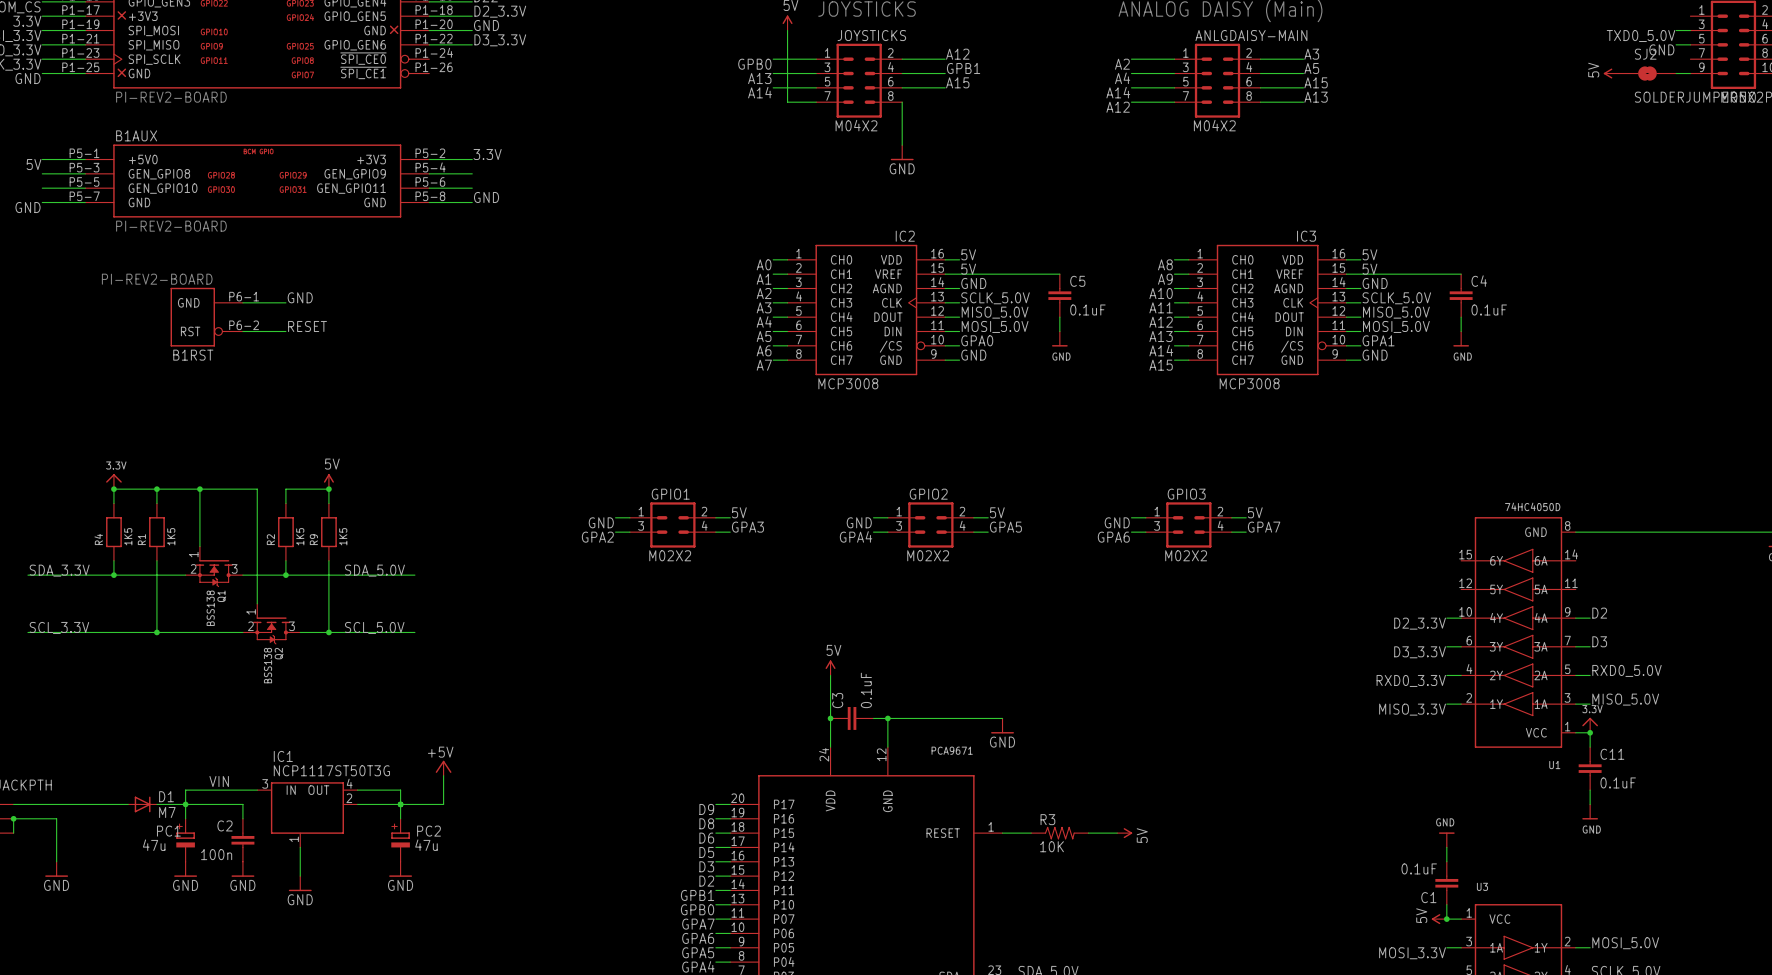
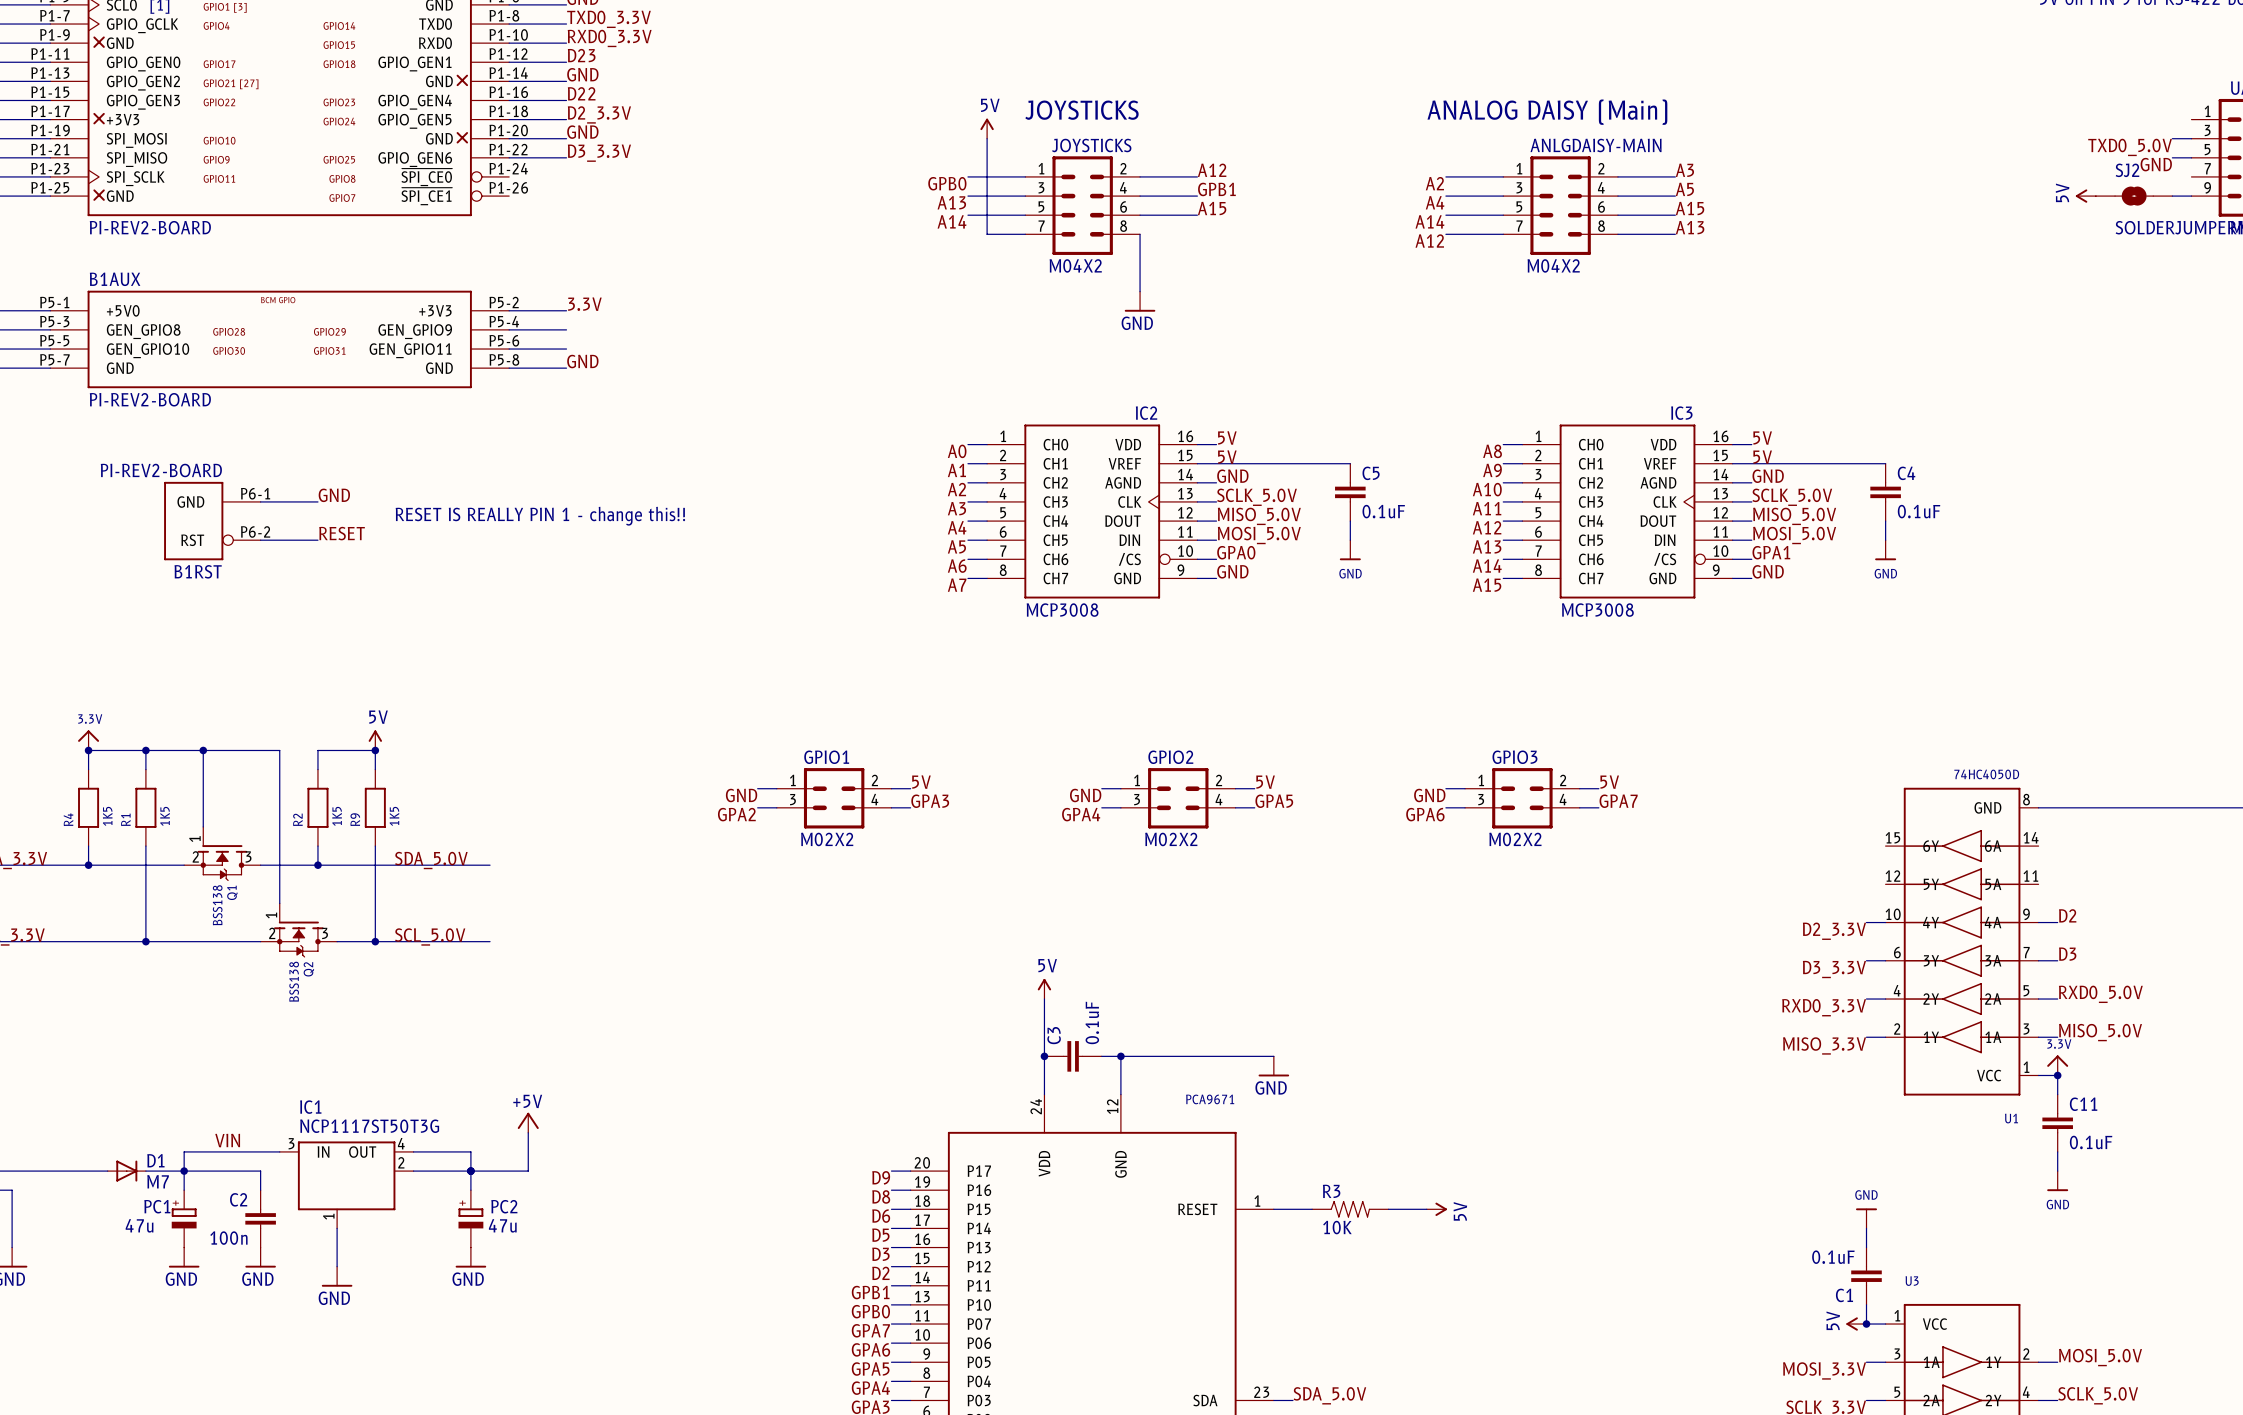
text: none -> RESET IS REALLY PIN 1 - change this!! (540, 516)

